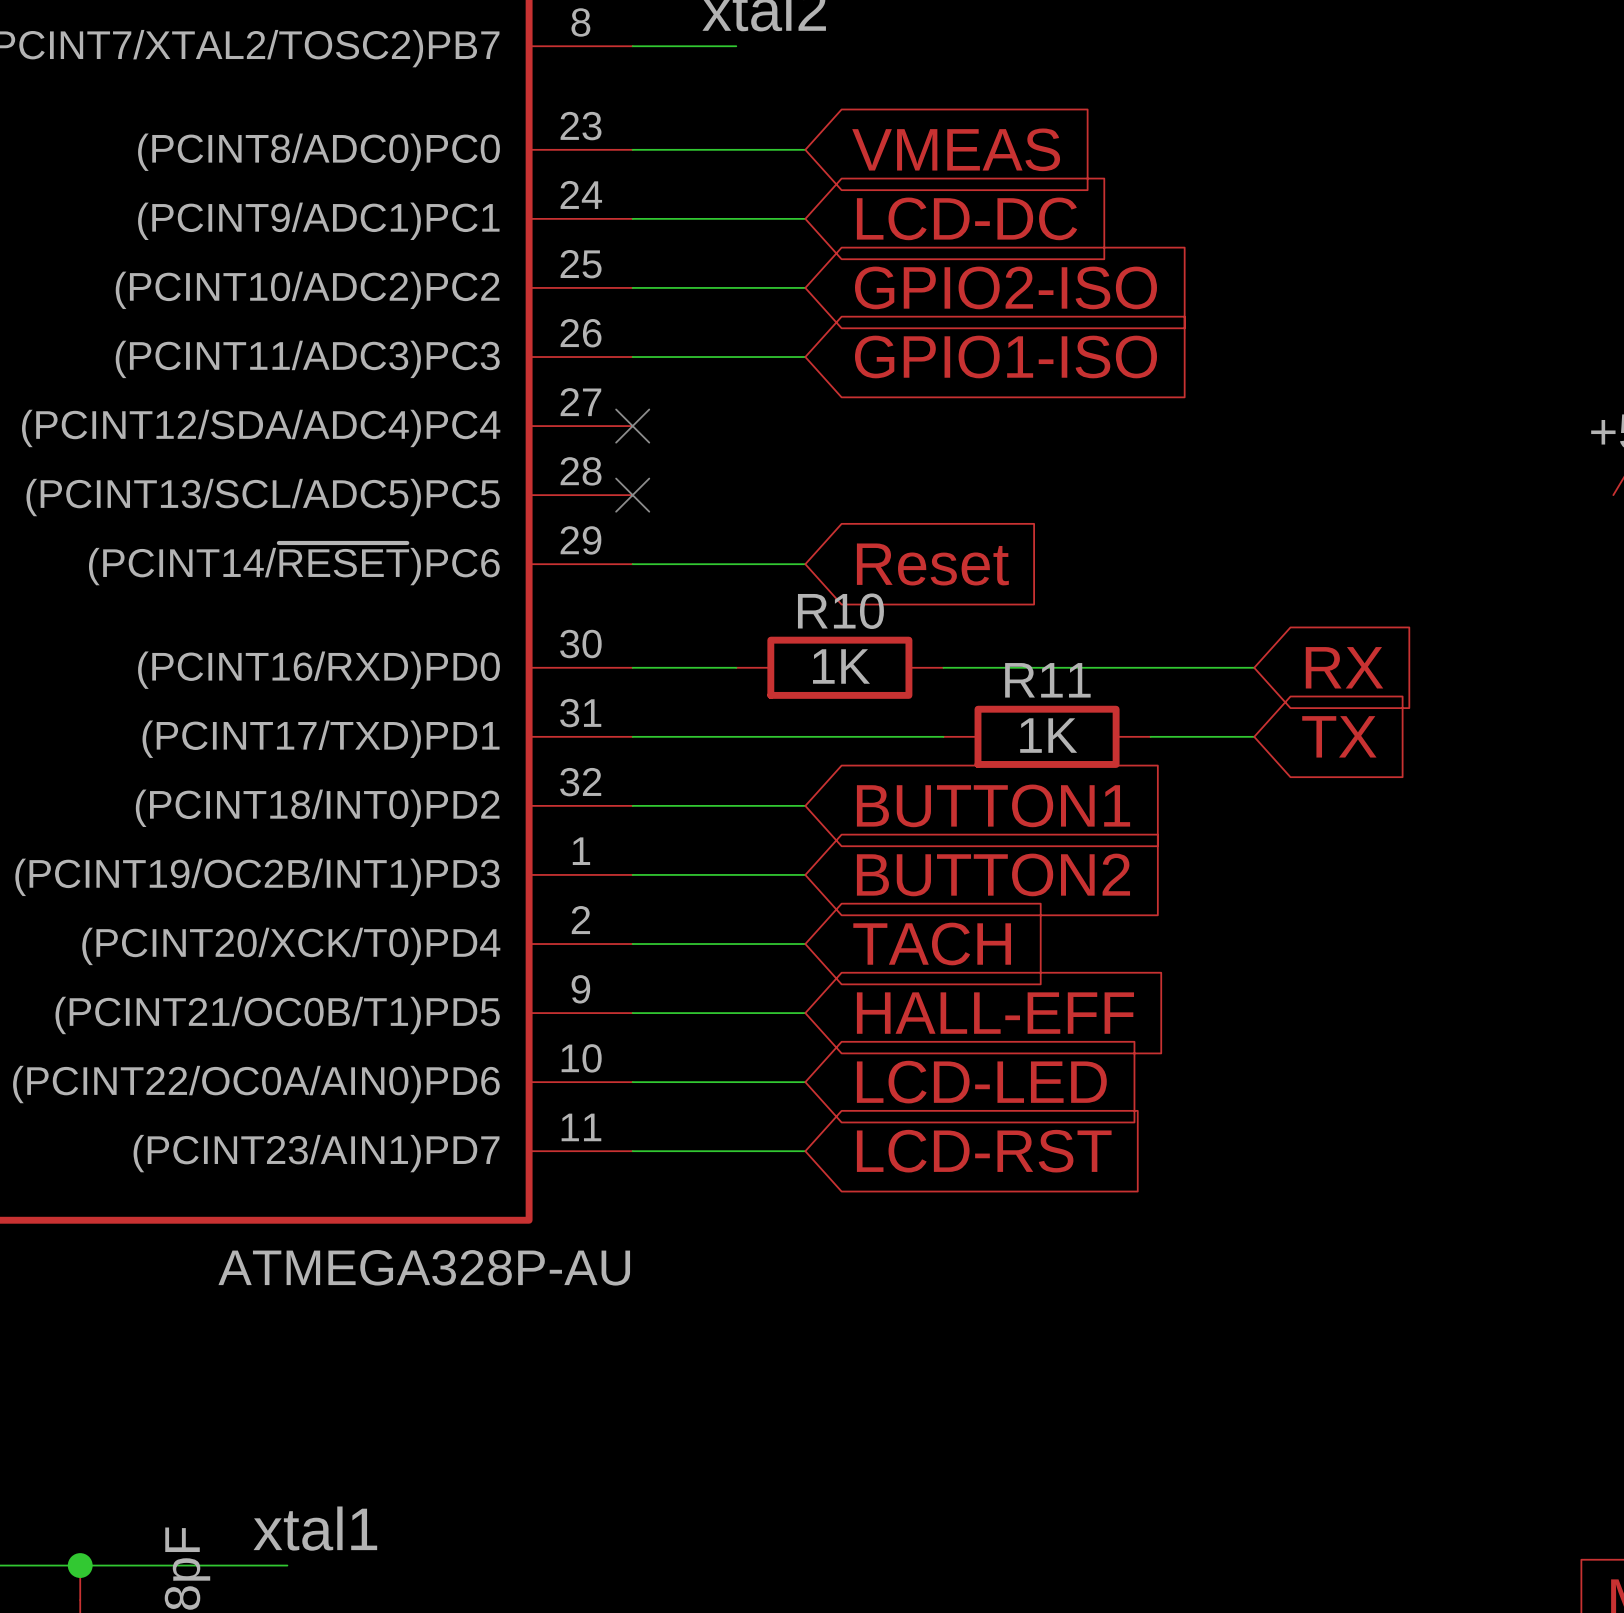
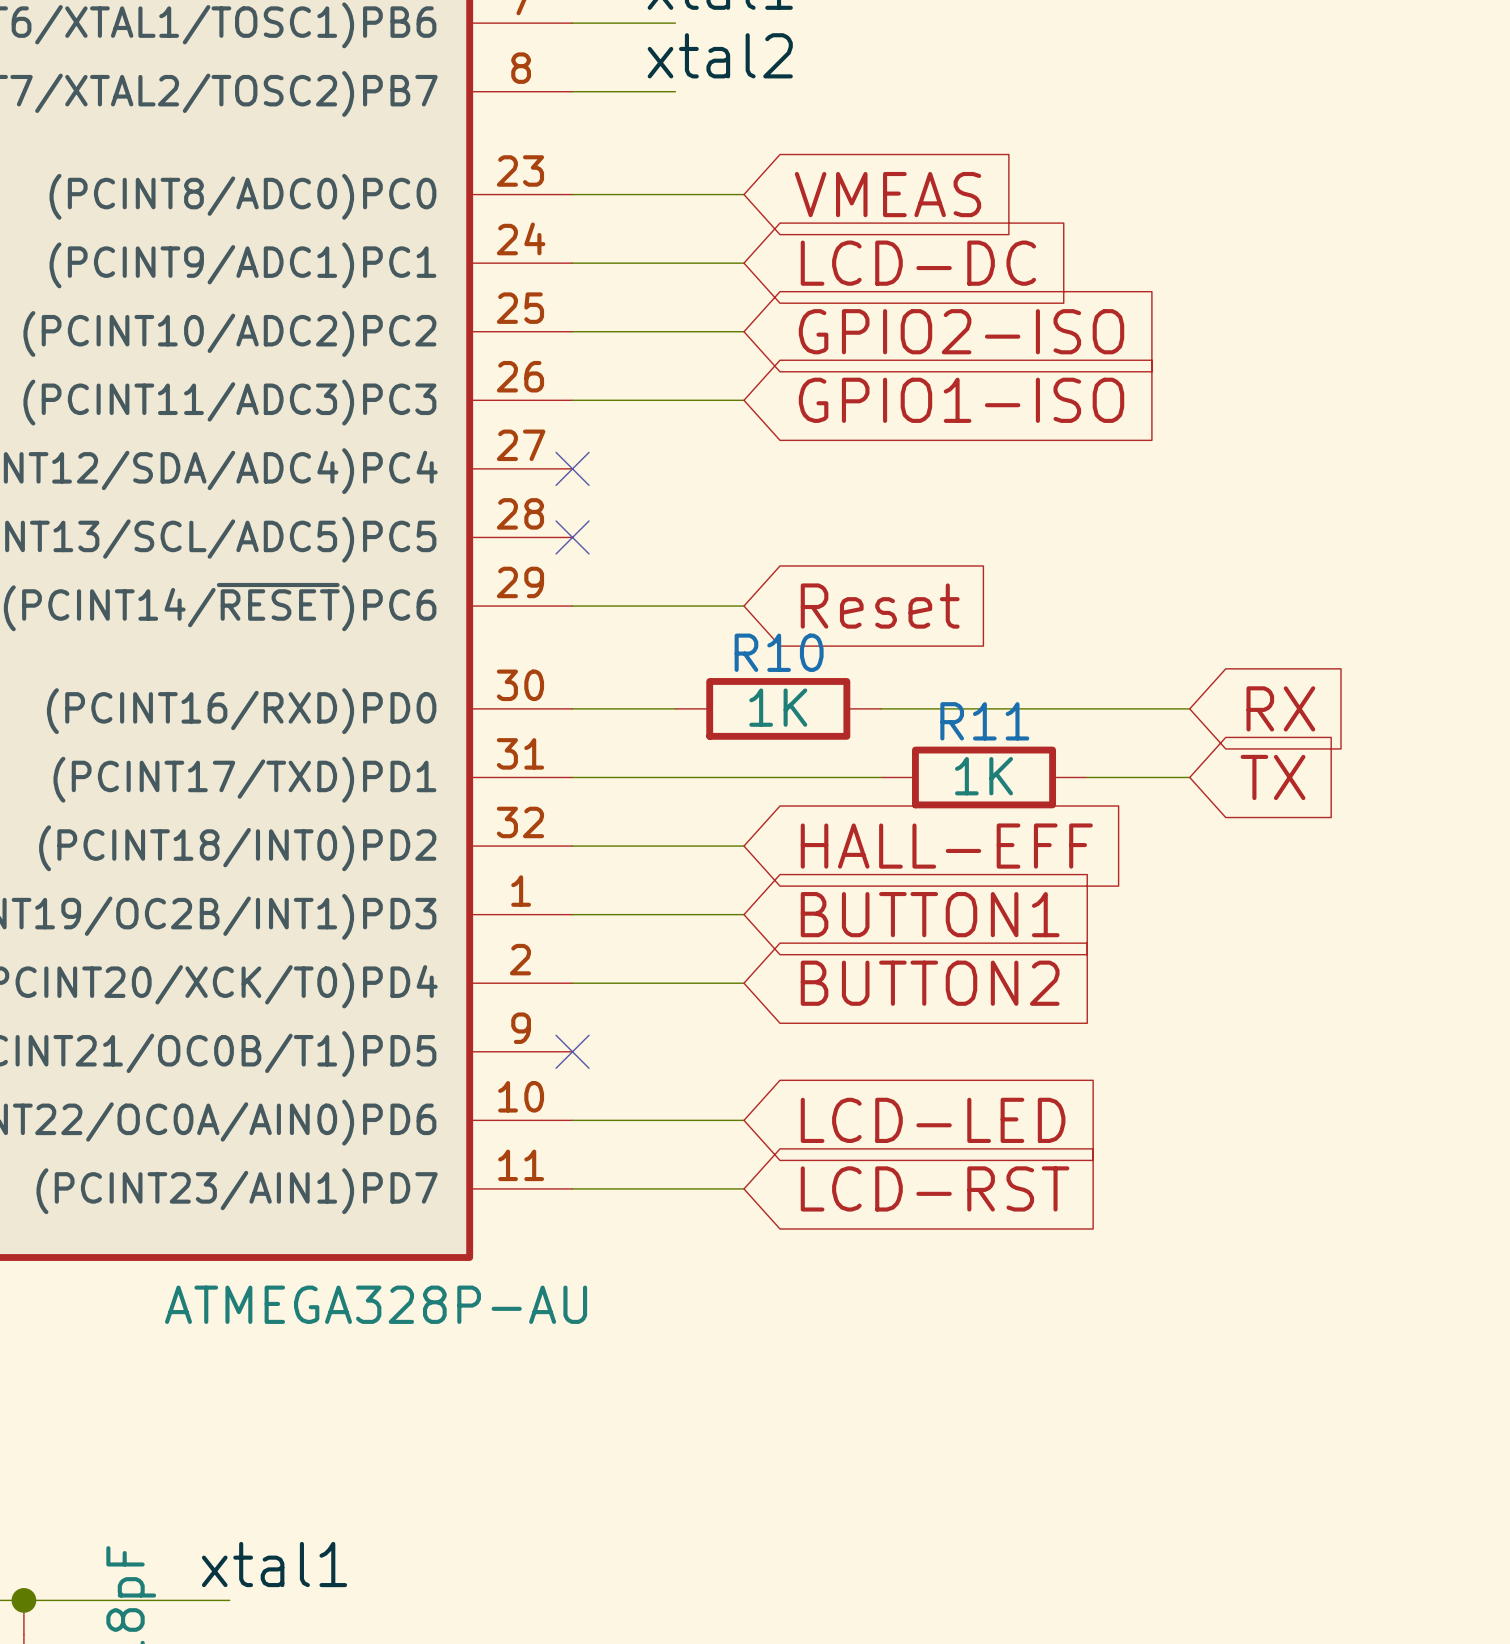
global label: BUTTON1 (993, 805) -> HALL-EFF (946, 846)
global label: BUTTON2 (993, 874) -> BUTTON1 (930, 914)
global label: TACH (932, 944) -> BUTTON2 (930, 983)
wire: (632, 1013) (805, 1013) -> none
no-connect mark: none -> (572, 1051)
global label: HALL-EFF (995, 1013) -> none

